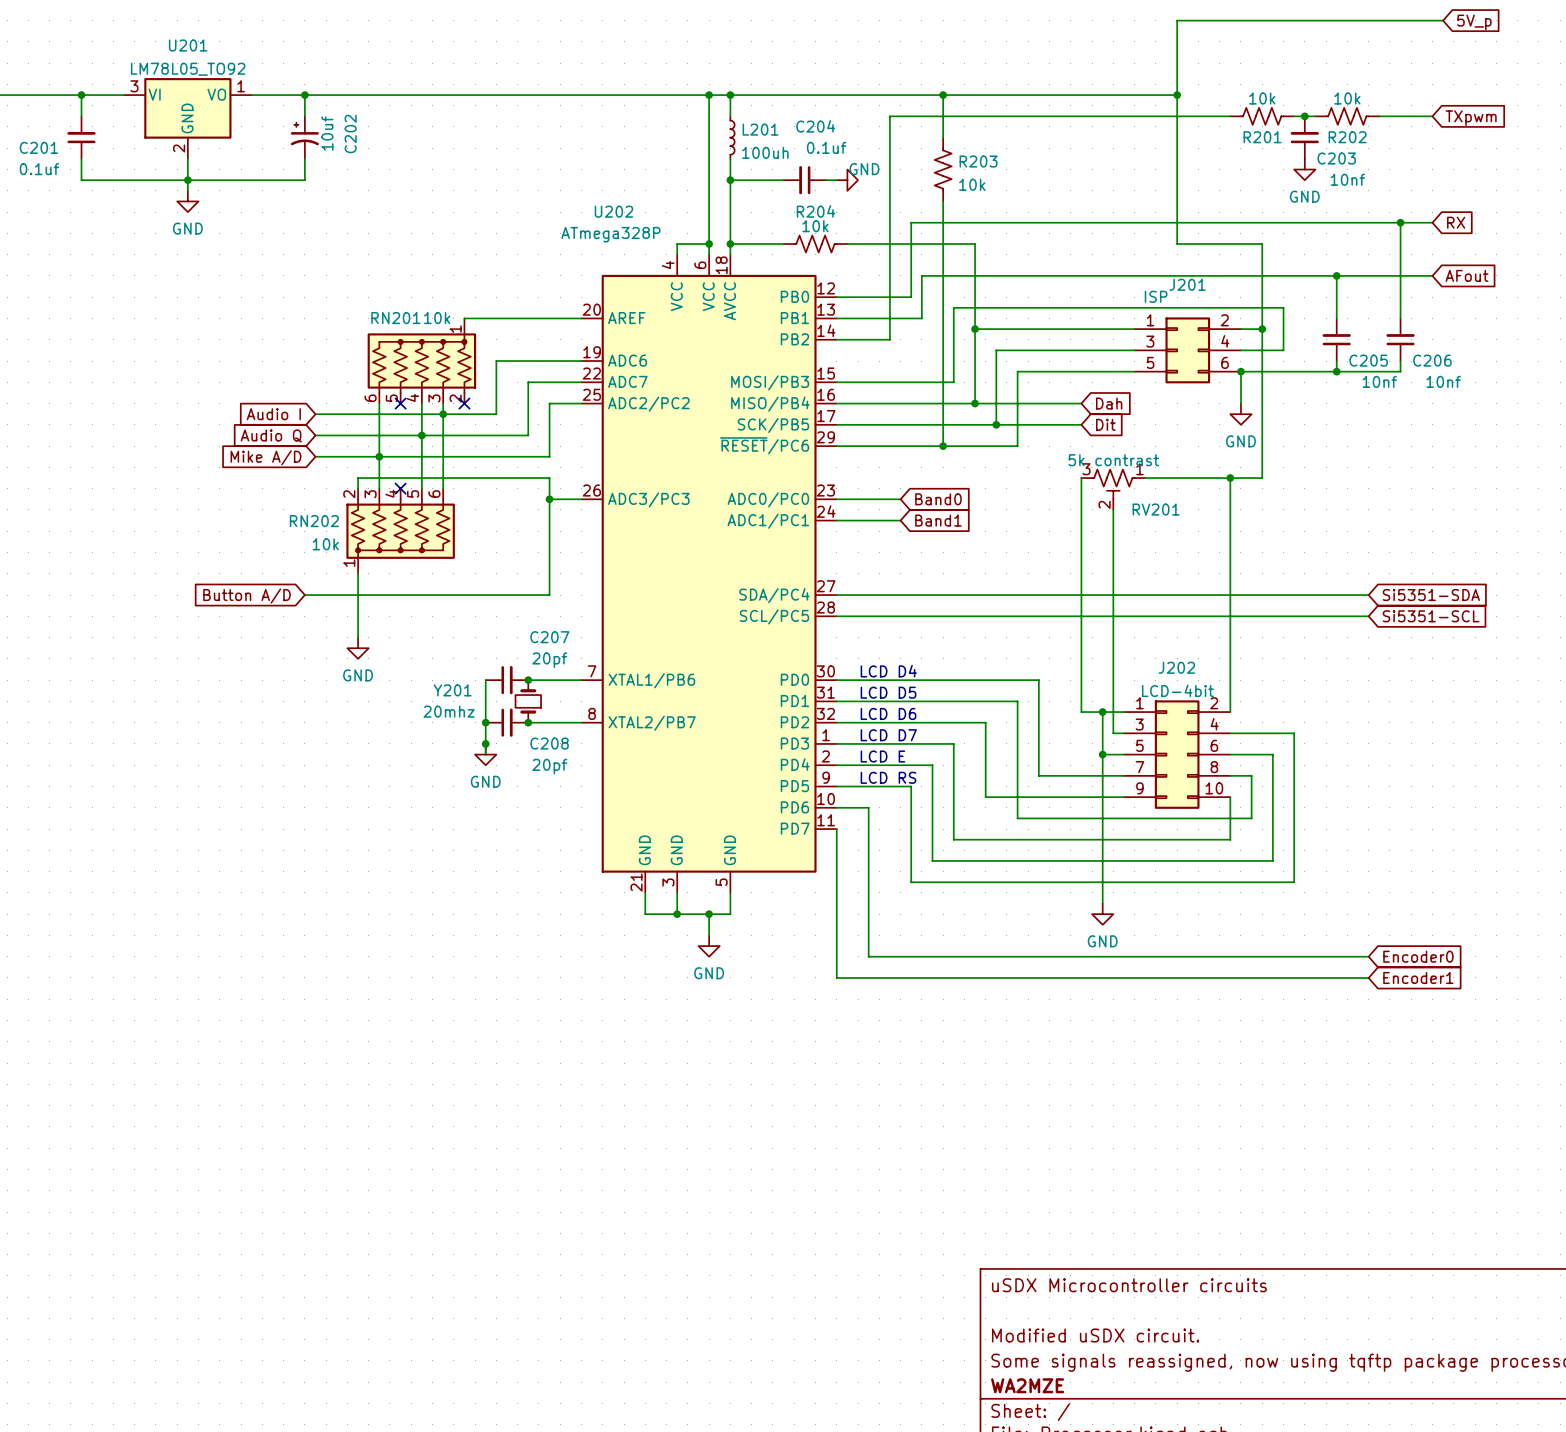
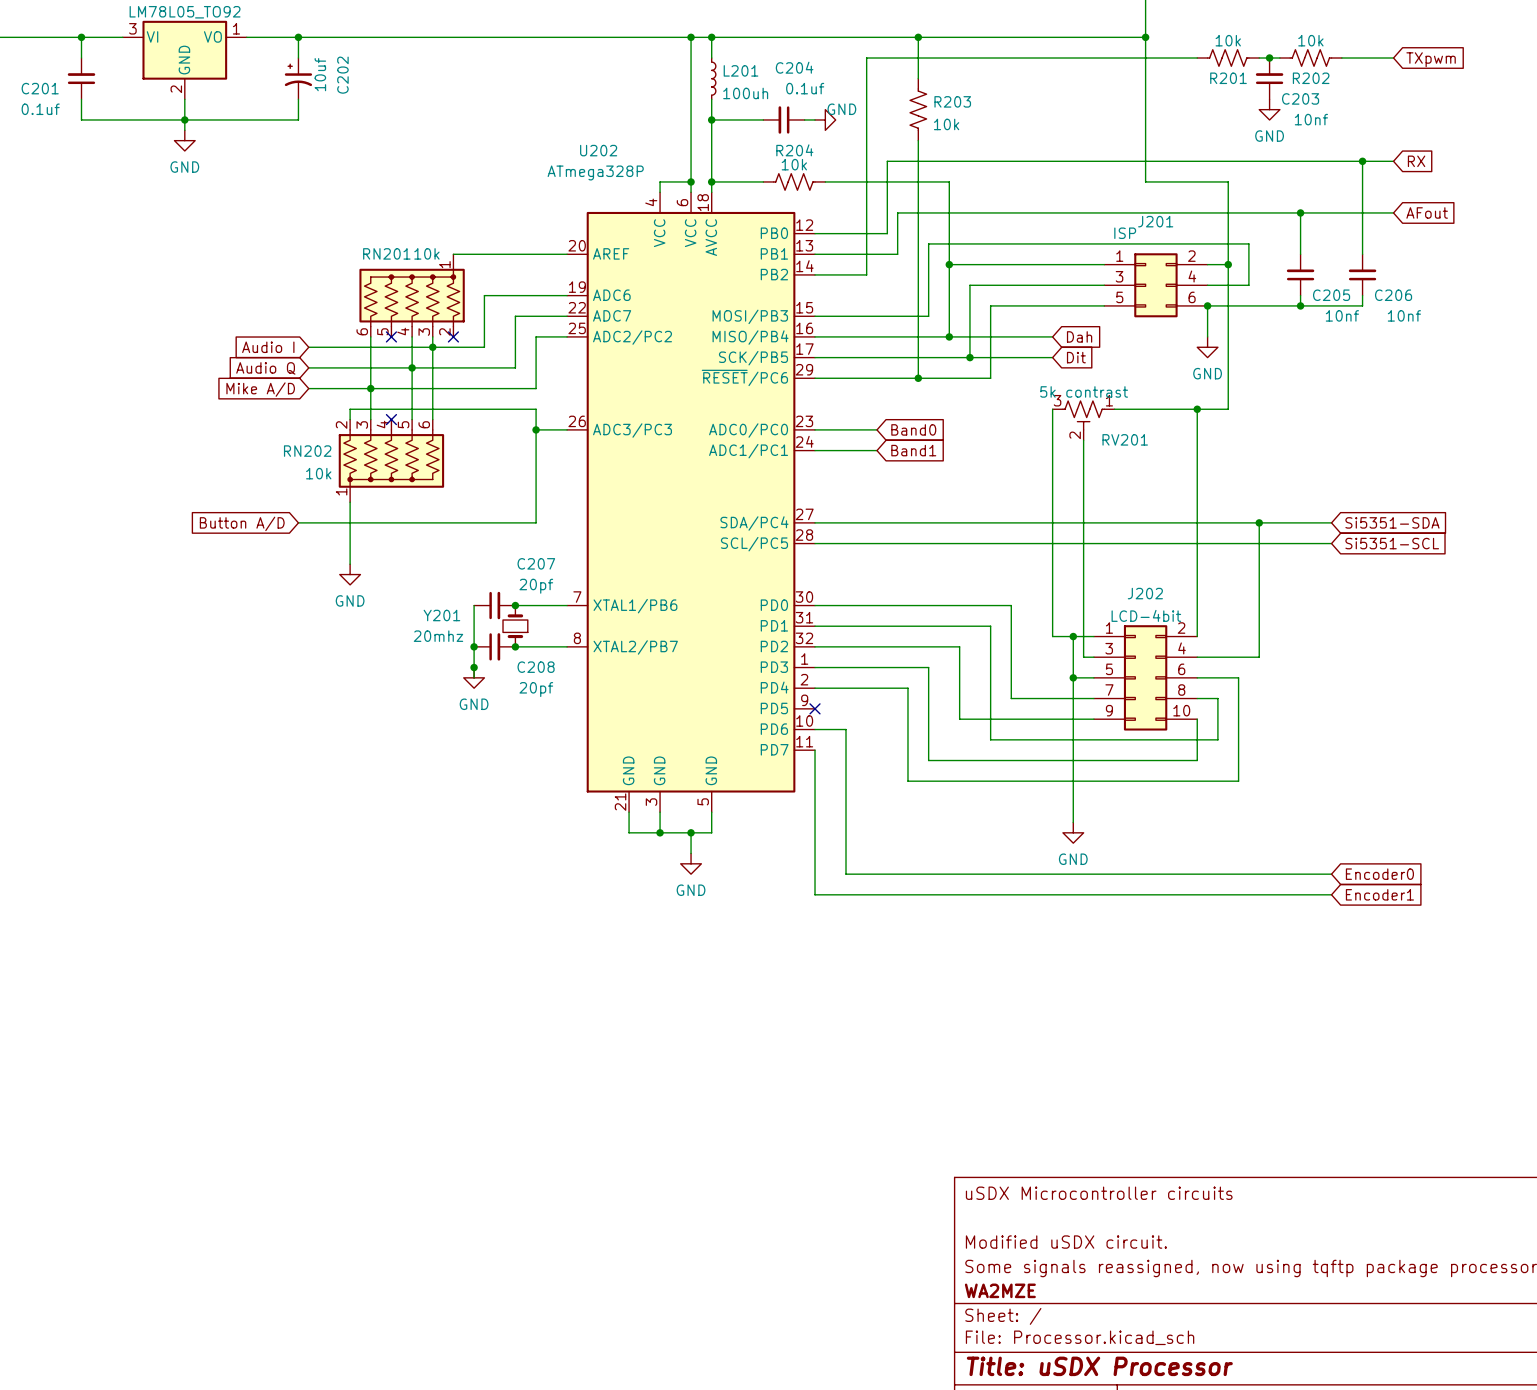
junction: none -> (1259, 522)
text: LCD D4 (888, 671) -> none
text: LCD D5 (888, 692) -> none
text: LCD D6 (888, 713) -> none
wire: (1294, 733) (1294, 882) (911, 882) (911, 786) (836, 786) -> (1259, 657) (1259, 522)
text: LCD D7 (888, 735) -> none
text: LCD E (882, 756) -> none
text: LCD RS (888, 777) -> none
no-connect mark: none -> (815, 708)

